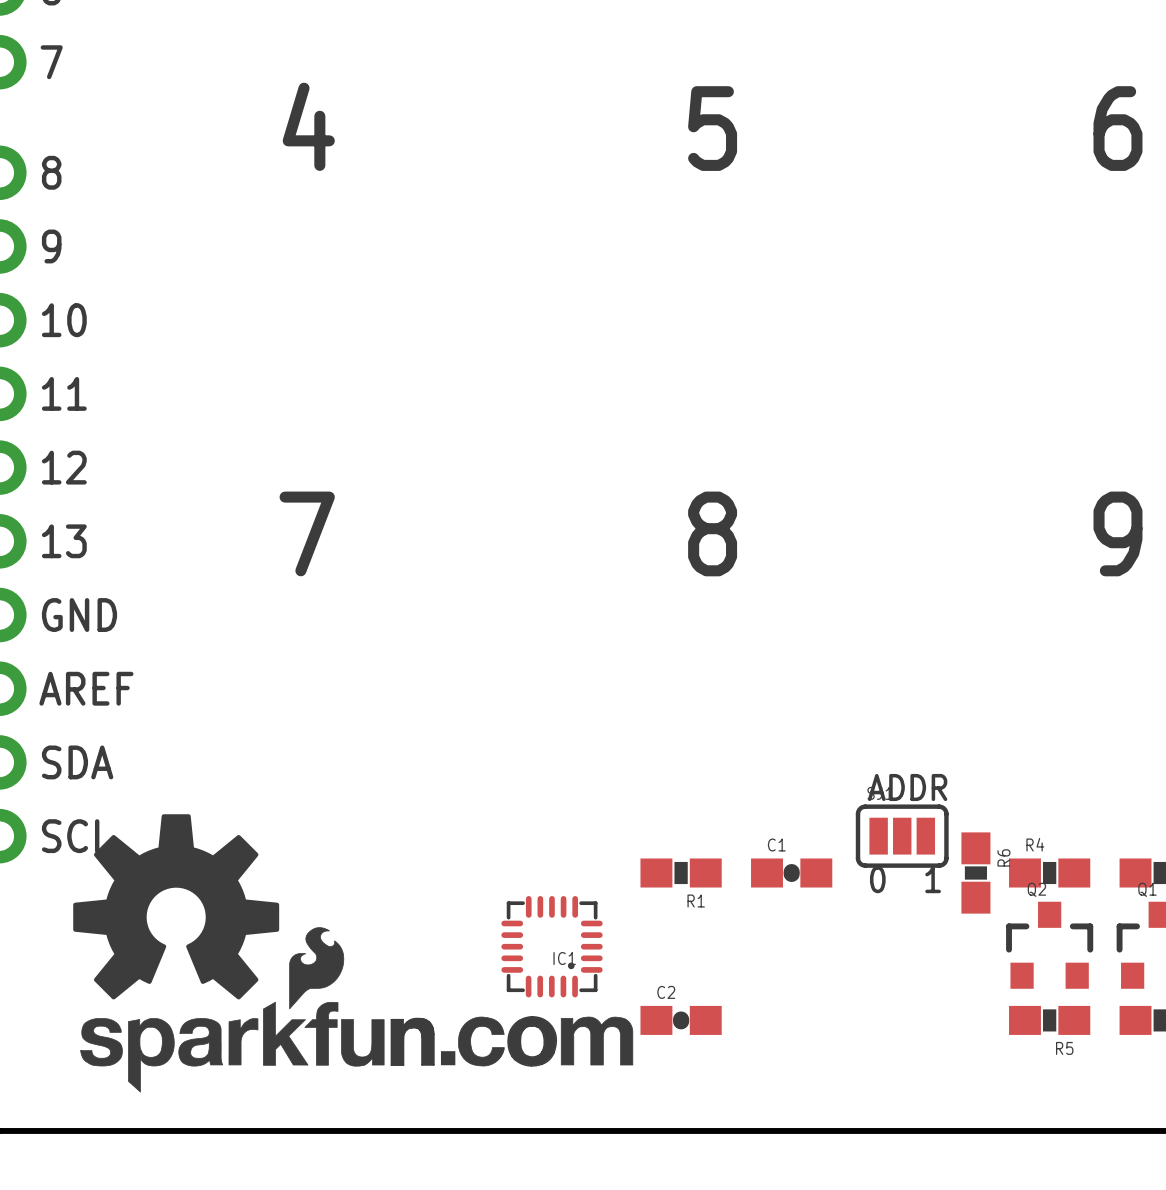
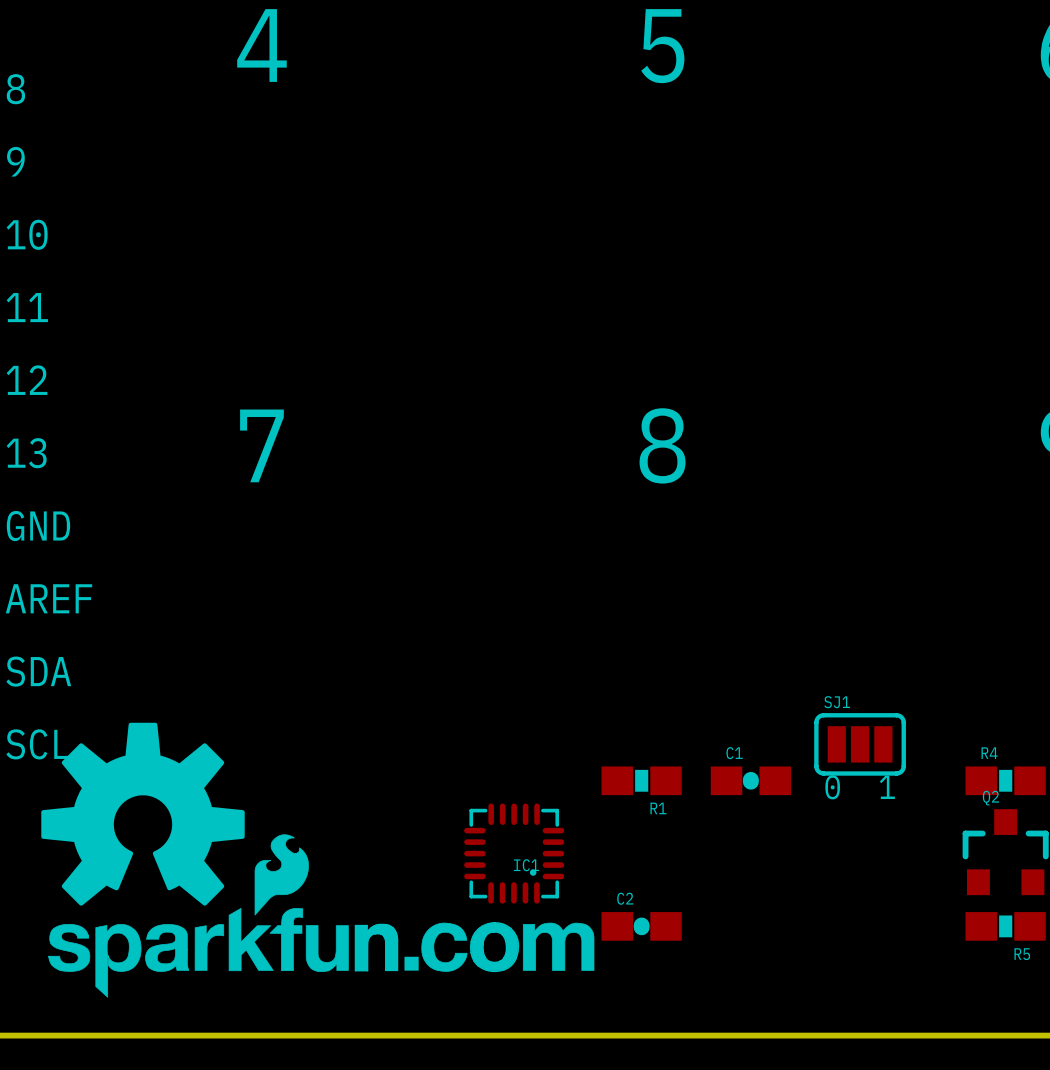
text: ADDR (907, 787) -> none
R6: (975, 873) -> none

